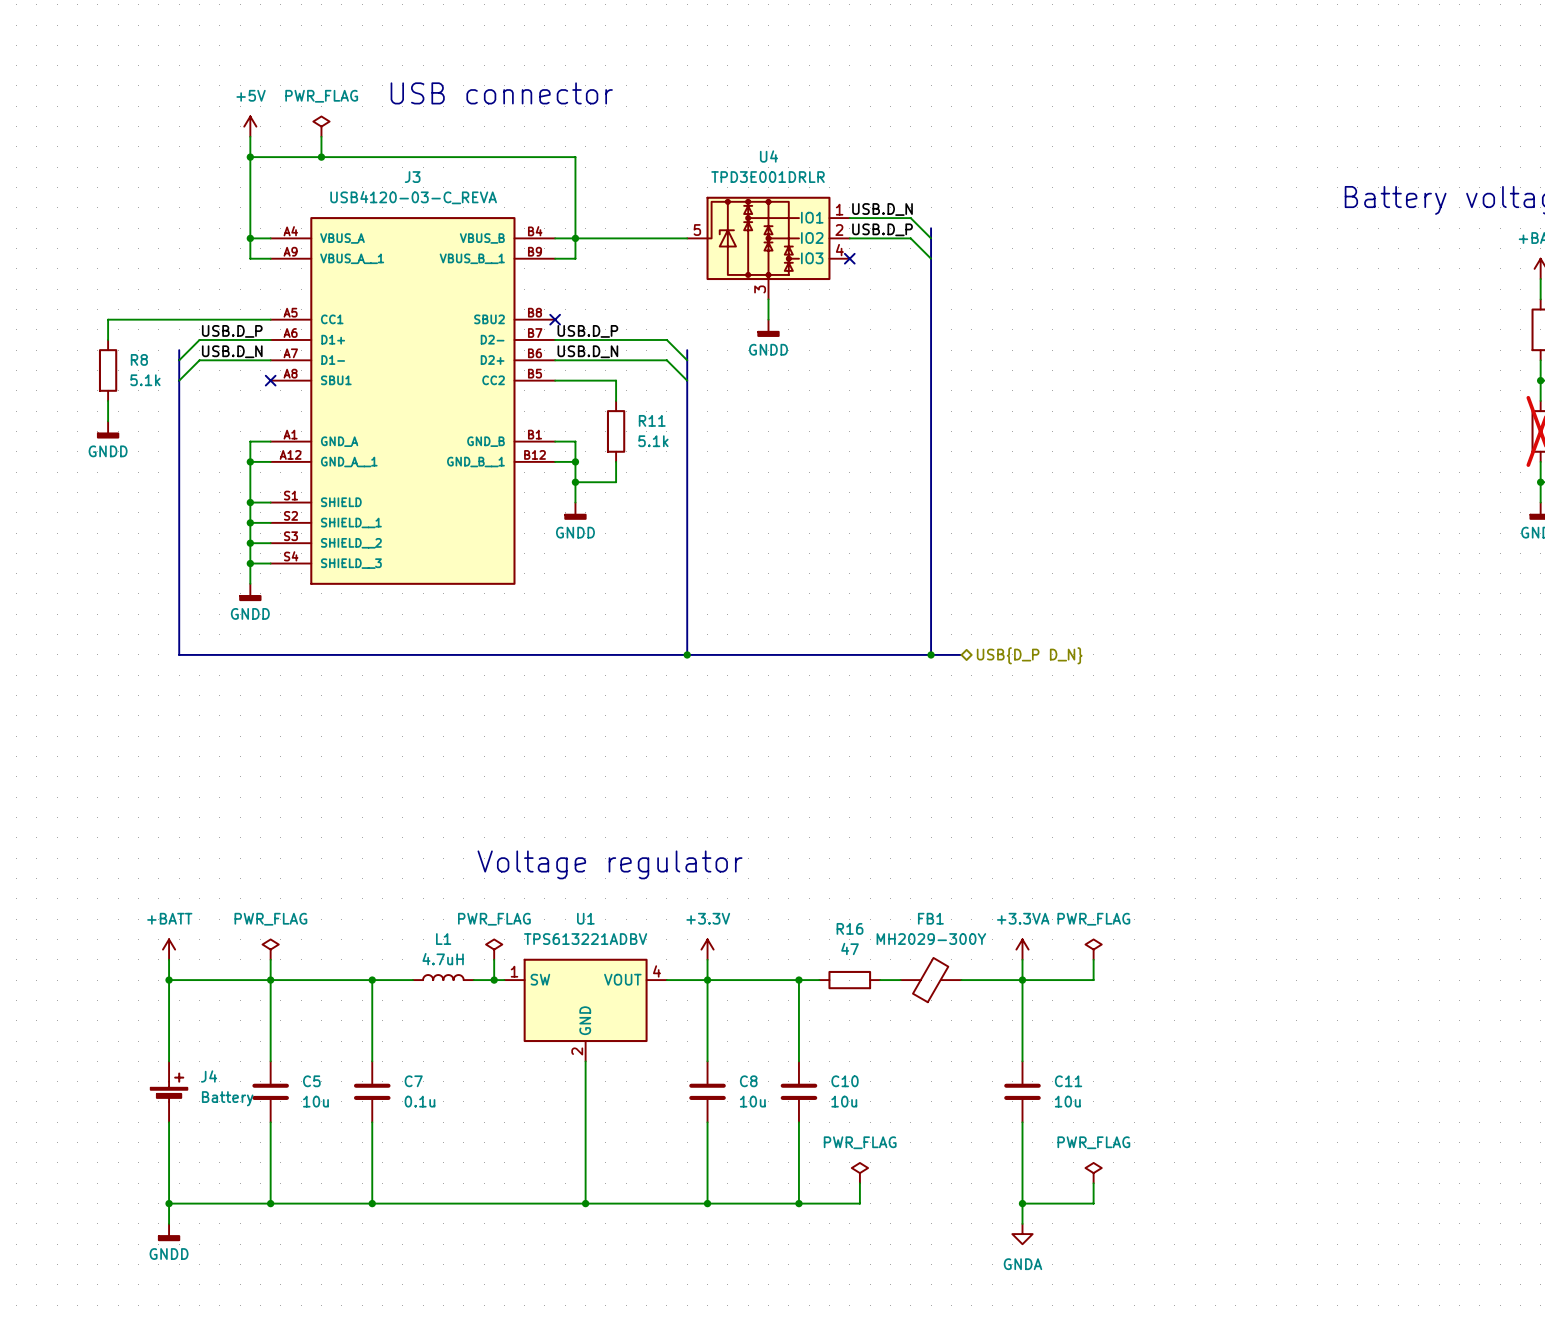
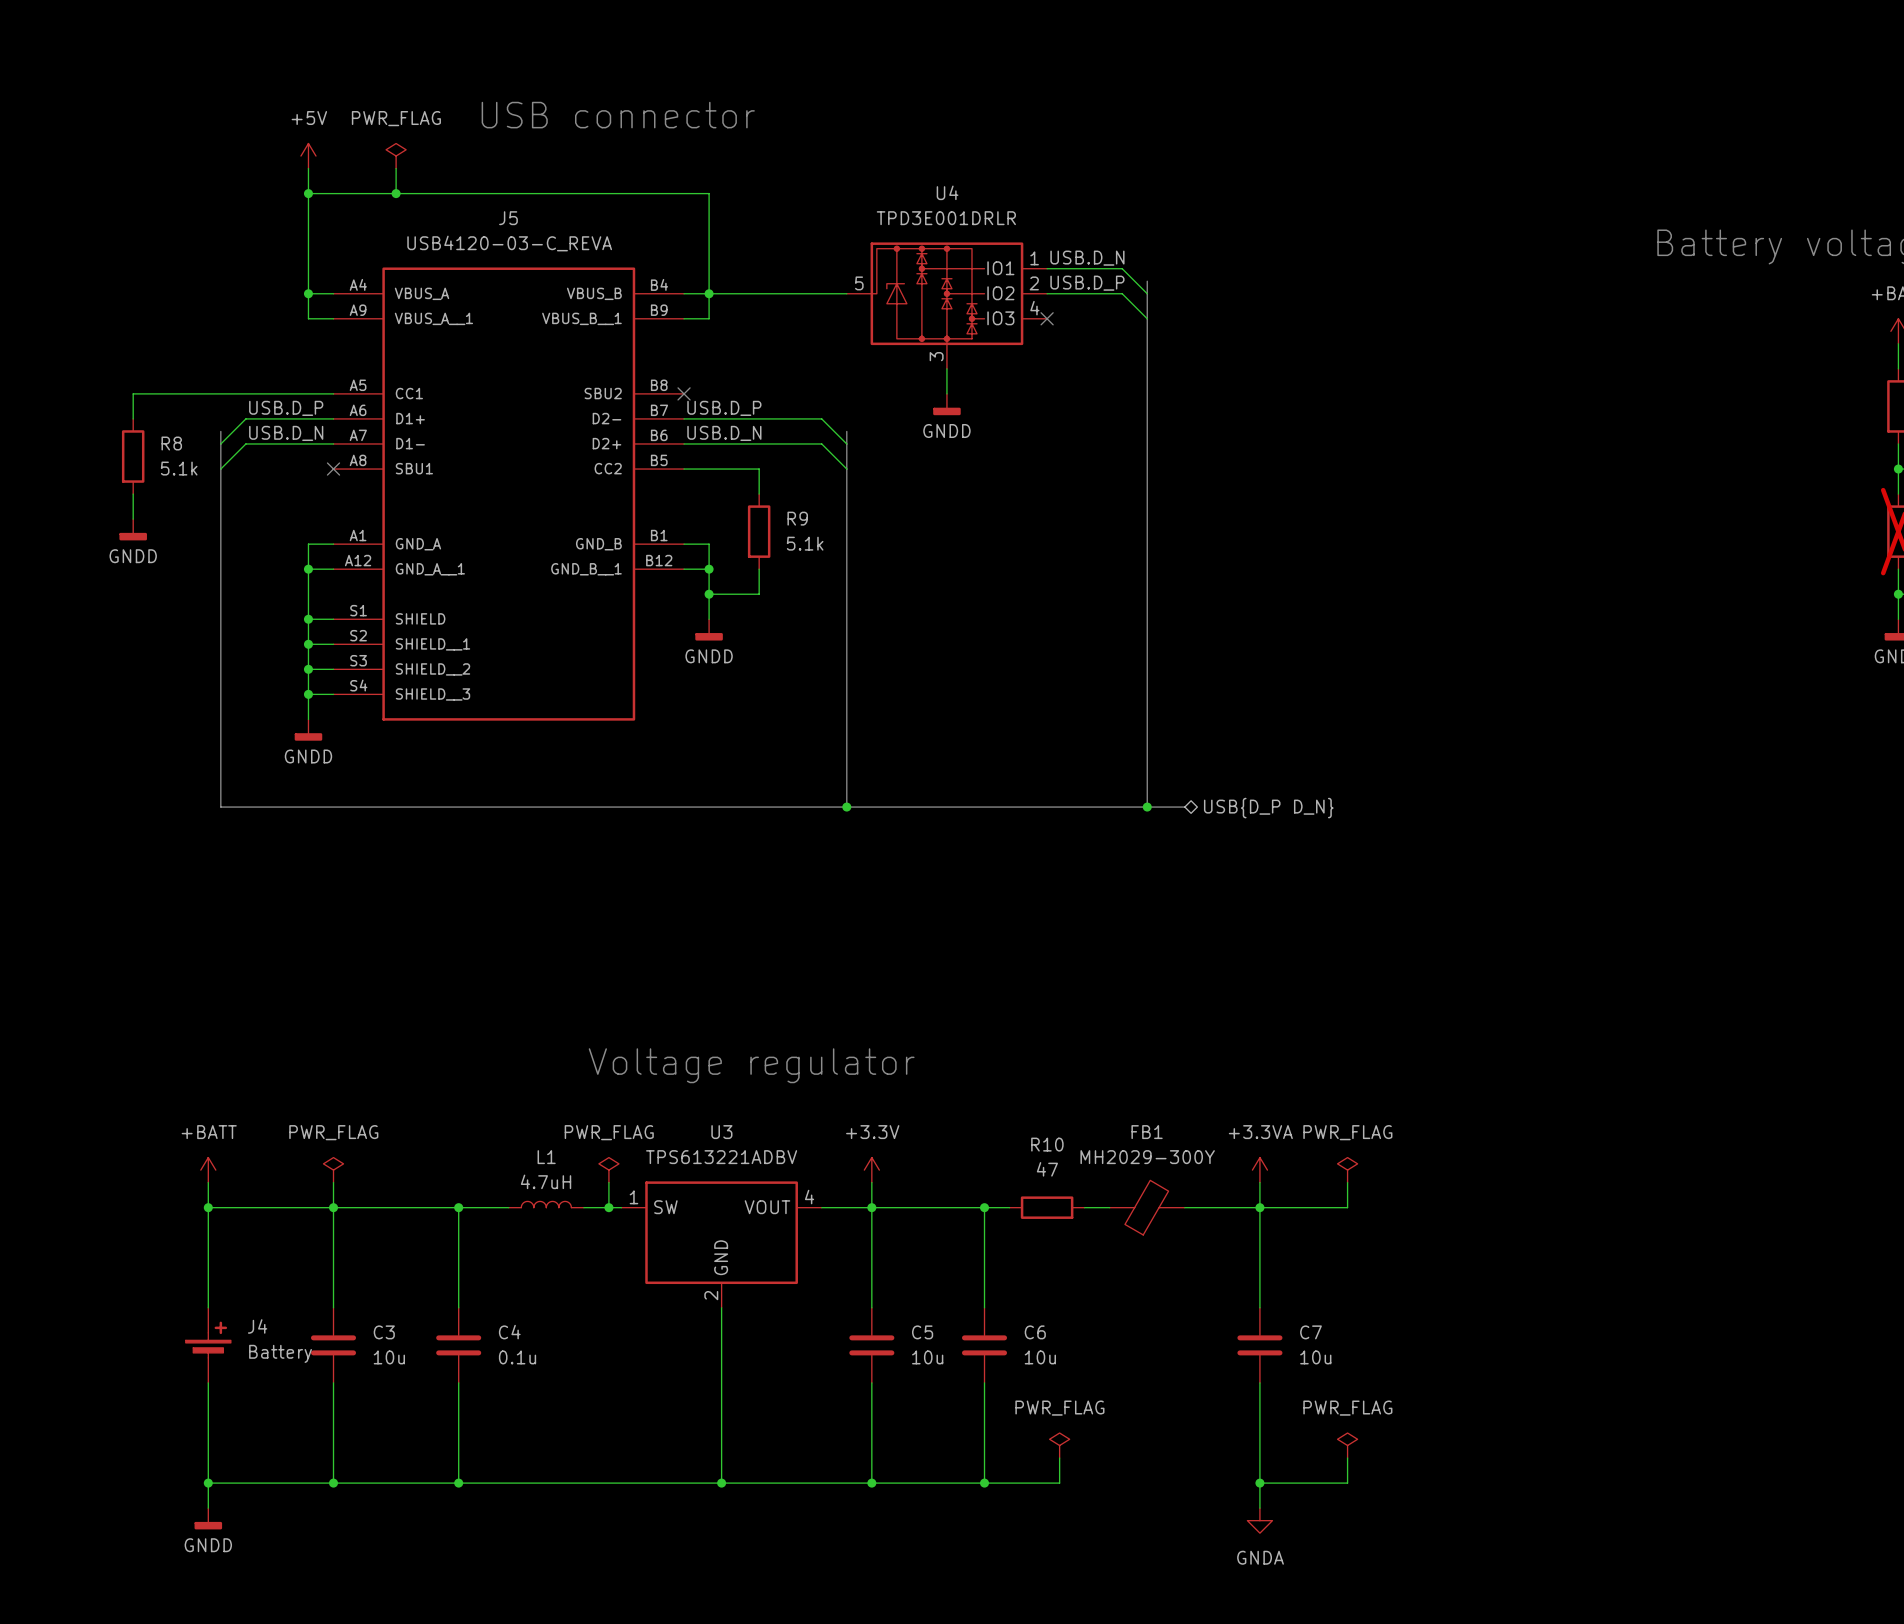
J3 name: J3 (412, 177) -> J5 (508, 218)
R11 name: R11 (652, 420) -> R9 (797, 518)
U1 name: U1 (585, 918) -> U3 (721, 1132)
R16 name: R16 (850, 928) -> R10 (1047, 1144)
C5 name: C5 (311, 1081) -> C3 (384, 1332)
C7 name: C7 (413, 1081) -> C4 (509, 1332)
C8 name: C8 (748, 1081) -> C5 (922, 1332)
C10 name: C10 (845, 1081) -> C6 (1035, 1332)
C11 name: C11 (1068, 1081) -> C7 (1311, 1332)

